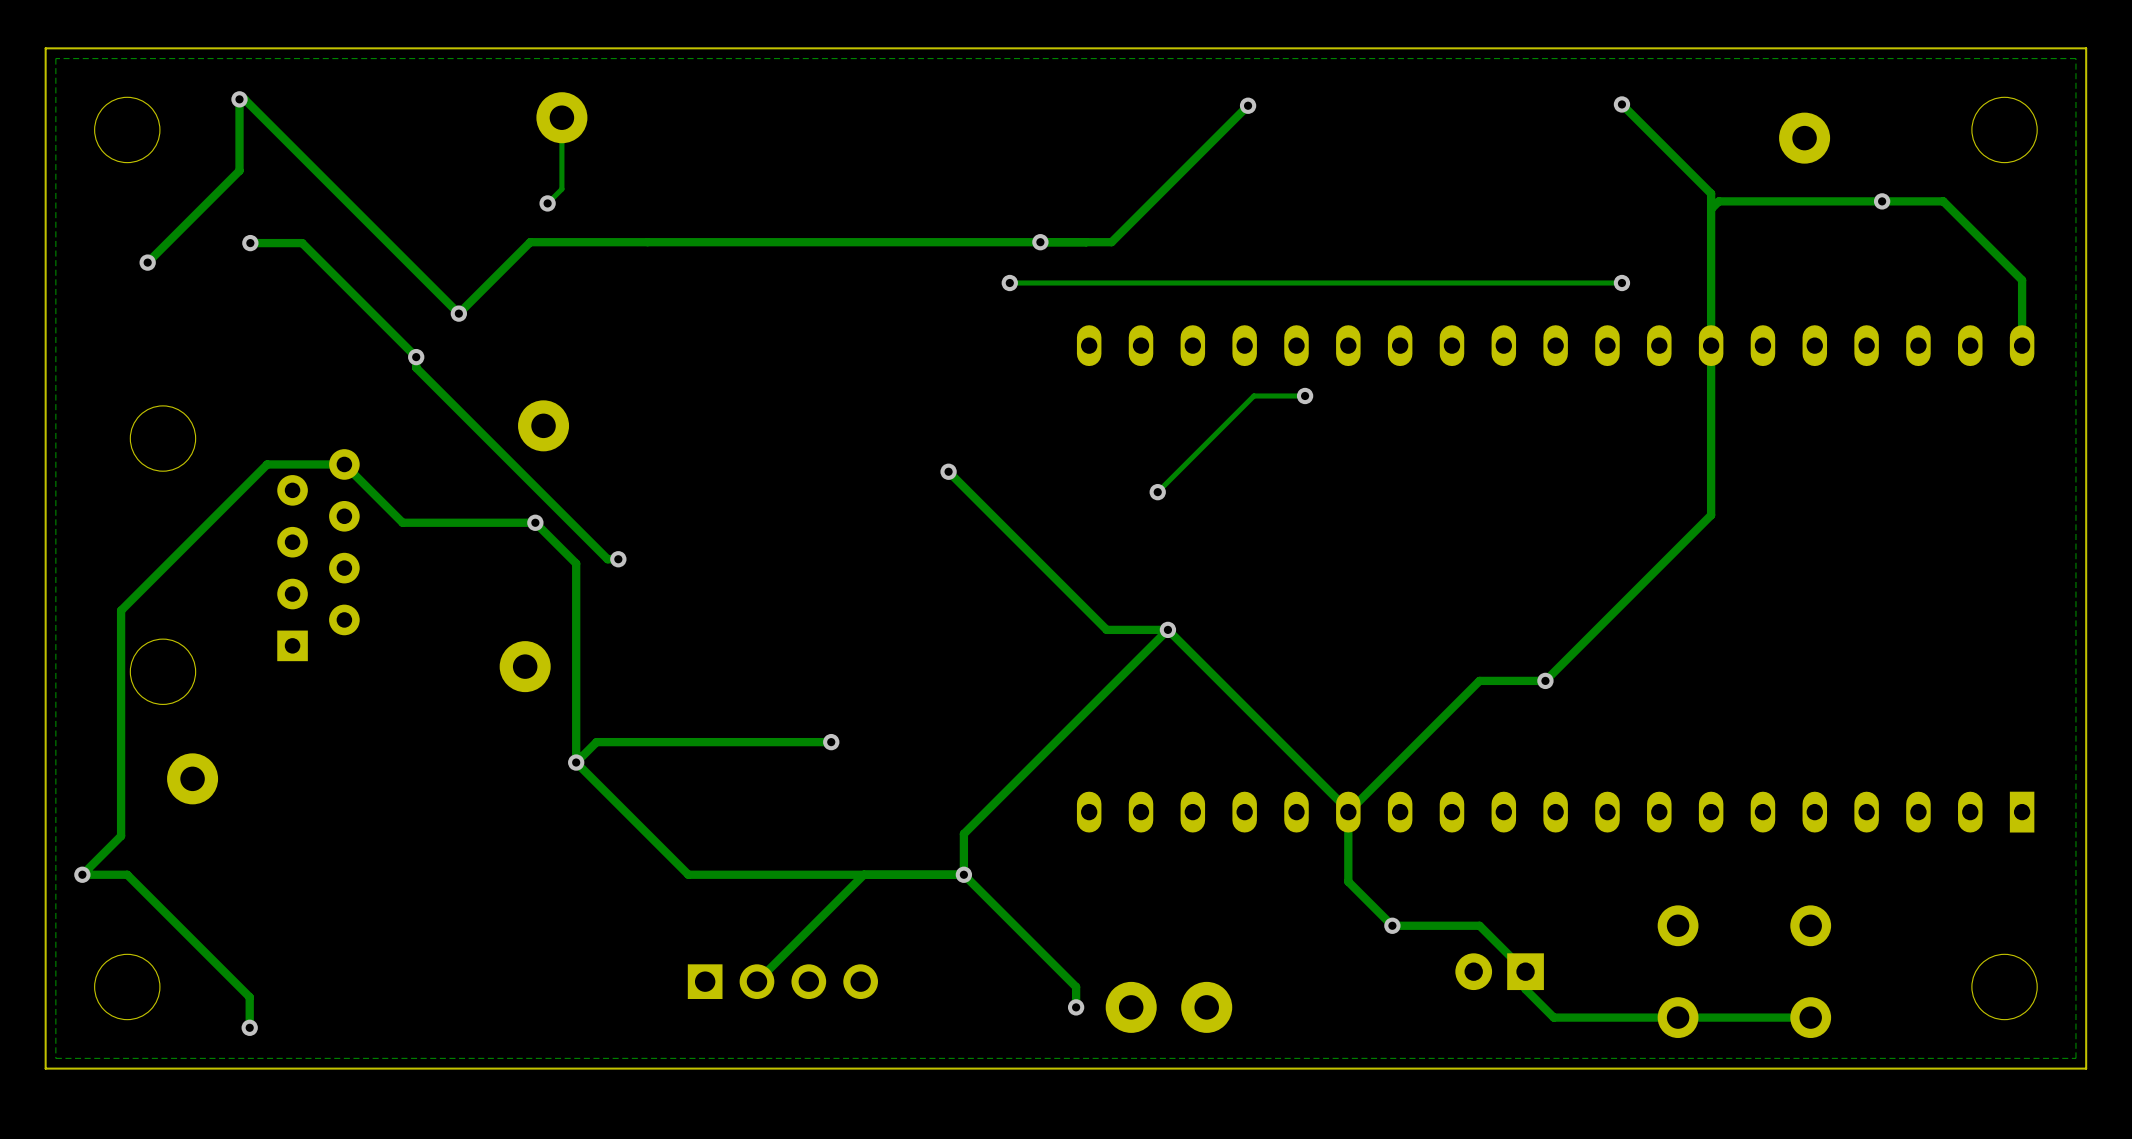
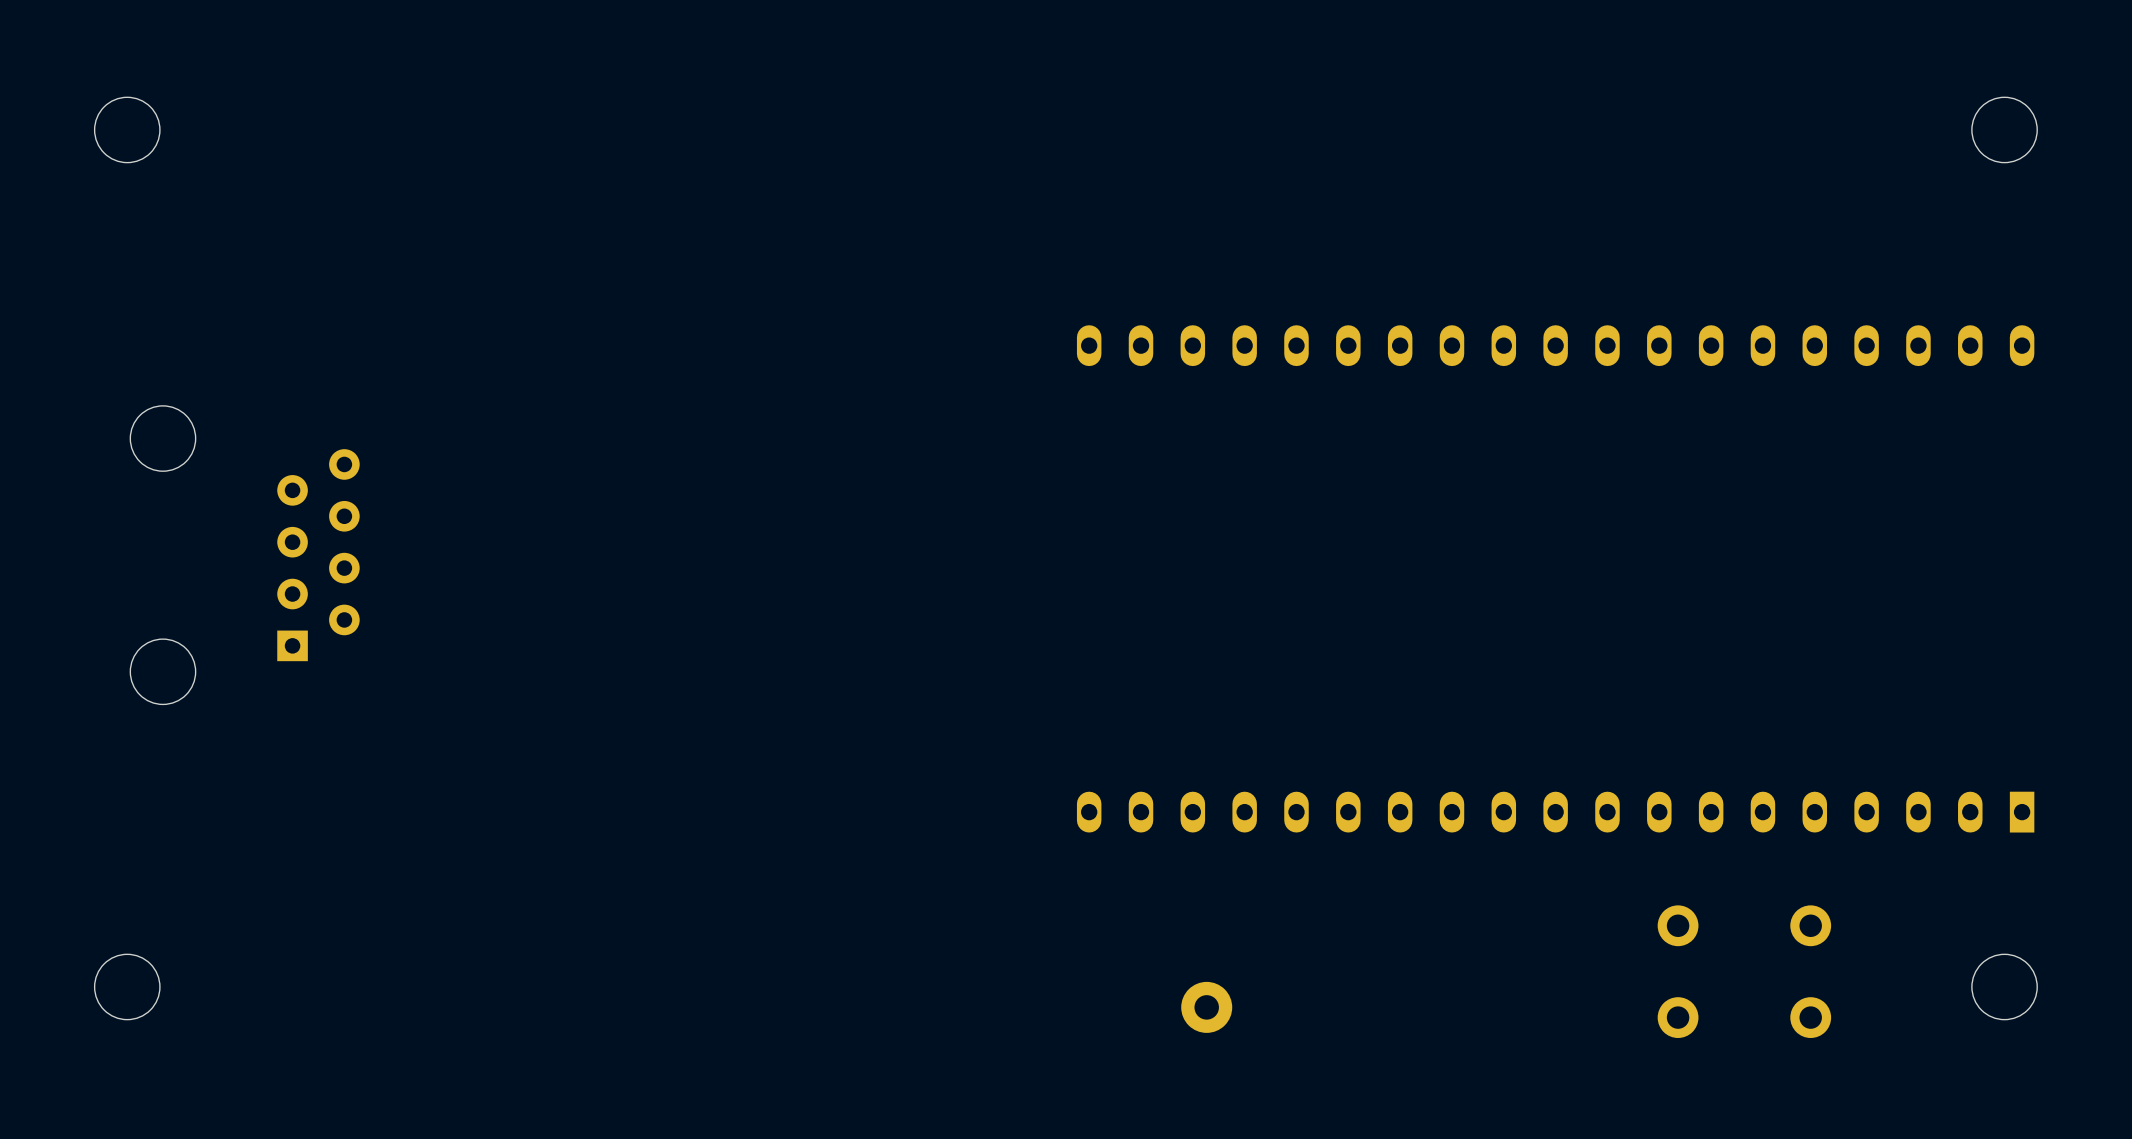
board edge: (2086, 48) (45, 48) (45, 1068) (2086, 1068) (2086, 48) -> none
zone outline: (2075, 58) (2075, 1058) (55, 1058) (55, 58) (2075, 58) -> none
via: (239, 99) -> none
track: (1621, 104) (1711, 193) (1711, 515) (1545, 680) (1479, 680) (1348, 812) -> none
via: (1621, 104) -> none
track: (1248, 105) (1111, 242) (530, 242) (458, 313) (244, 99) (239, 99) (239, 170) (147, 262) -> none
via: (1248, 105) -> none
track: (561, 117) (561, 189) (547, 203) -> none
part: (561, 117) -> none
part: (1804, 138) -> none
via: (1882, 201) -> none
via: (547, 203) -> none
track: (1711, 209) (1718, 201) (1943, 201) (2022, 280) (2022, 345) -> none
via: (1040, 242) -> none
track: (250, 243) (302, 243) (416, 357) (416, 367) (607, 559) (618, 559) -> none
via: (250, 243) -> none
via: (147, 262) -> none
via: (1009, 283) -> none
track: (1621, 283) (1009, 283) -> none
via: (1621, 283) -> none
via: (458, 313) -> none
via: (416, 357) -> none
track: (1305, 395) (1253, 395) (1157, 492) -> none
via: (1305, 395) -> none
part: (543, 425) -> none
track: (948, 471) (1106, 629) (1167, 629) -> none
via: (948, 471) -> none
via: (1157, 492) -> none
via: (535, 522) -> none
via: (618, 559) -> none
track: (1167, 629) (1348, 810) (1348, 881) (1392, 925) (1479, 925) (1525, 971) (1525, 989) (1553, 1017) (1810, 1017) -> none
track: (1167, 629) (963, 833) (963, 874) -> none
via: (1167, 629) -> none
part: (525, 666) -> none
via: (1545, 680) -> none
track: (831, 742) (596, 742) (576, 762) -> none
via: (831, 742) -> none
track: (576, 762) (576, 563) (535, 522) (402, 522) (344, 464) (267, 464) (121, 610) (121, 836) (82, 874) (127, 874) (249, 997) (249, 1027) -> none
track: (576, 762) (688, 874) (963, 874) -> none
via: (576, 762) -> none
part: (192, 778) -> none
via: (82, 874) -> none
track: (863, 874) (756, 981) -> none
track: (963, 874) (1076, 986) (1076, 1007) -> none
via: (963, 874) -> none
via: (1392, 925) -> none
part: (1499, 971) -> none
part: (782, 981) -> none
via: (1076, 1007) -> none
part: (1131, 1007) -> none
via: (249, 1027) -> none

